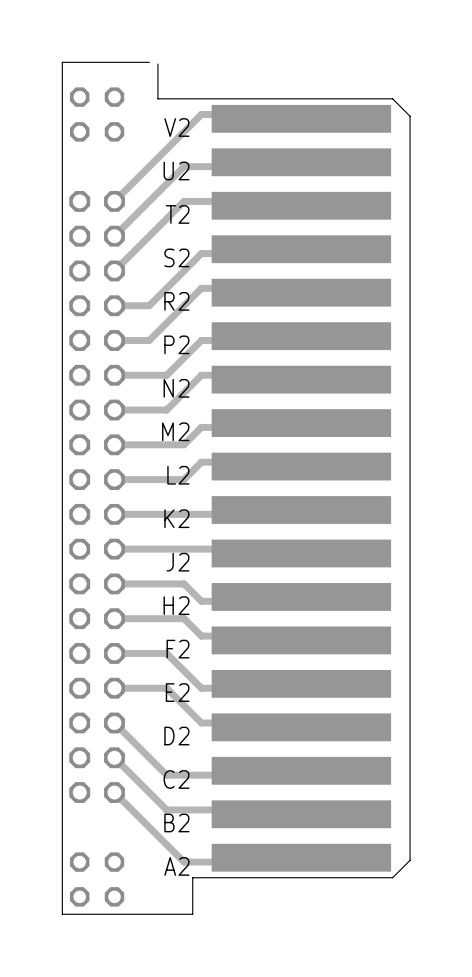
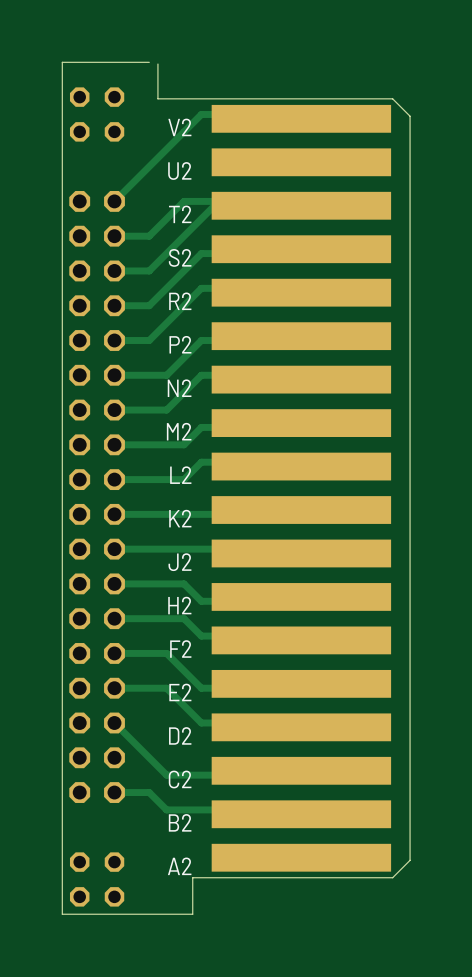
track: (301, 162) (288, 166) (184, 166) (114, 236) -> none
track: none -> (301, 205) (218, 201) (149, 270) (114, 270)
track: (149, 236) (114, 270) -> (149, 236) (114, 236)
track: (114, 757) (149, 792) -> (114, 792) (149, 792)
track: (114, 792) (184, 862) (288, 862) (301, 857) -> none

